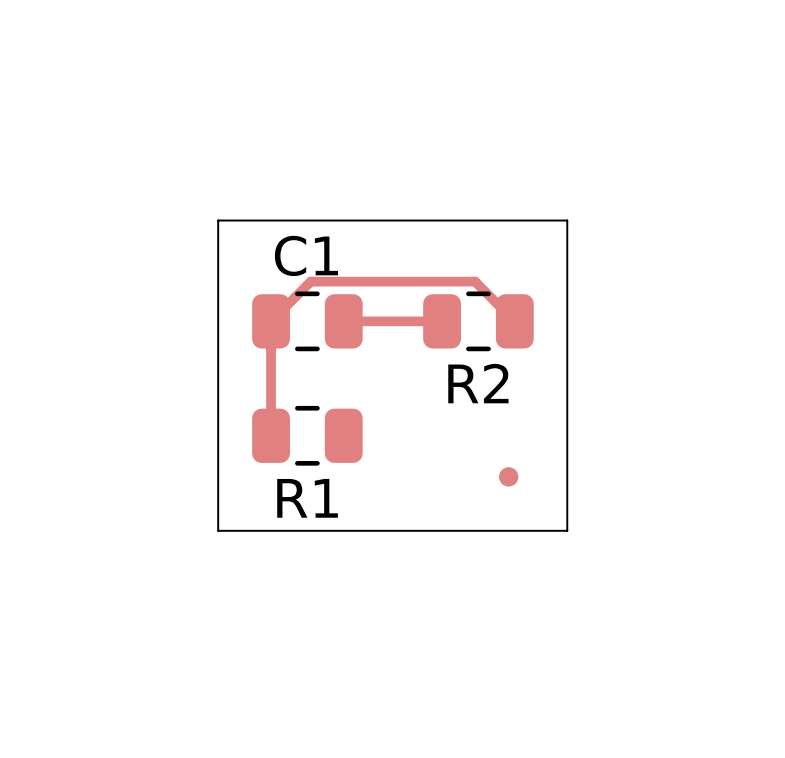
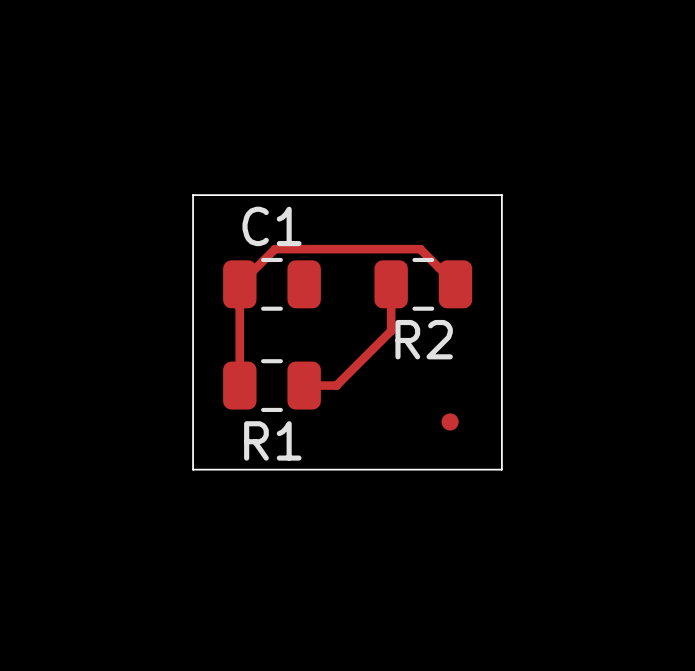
top track: (343, 321) (442, 321) -> (304, 385) (336, 385) (391, 330) (391, 284)

